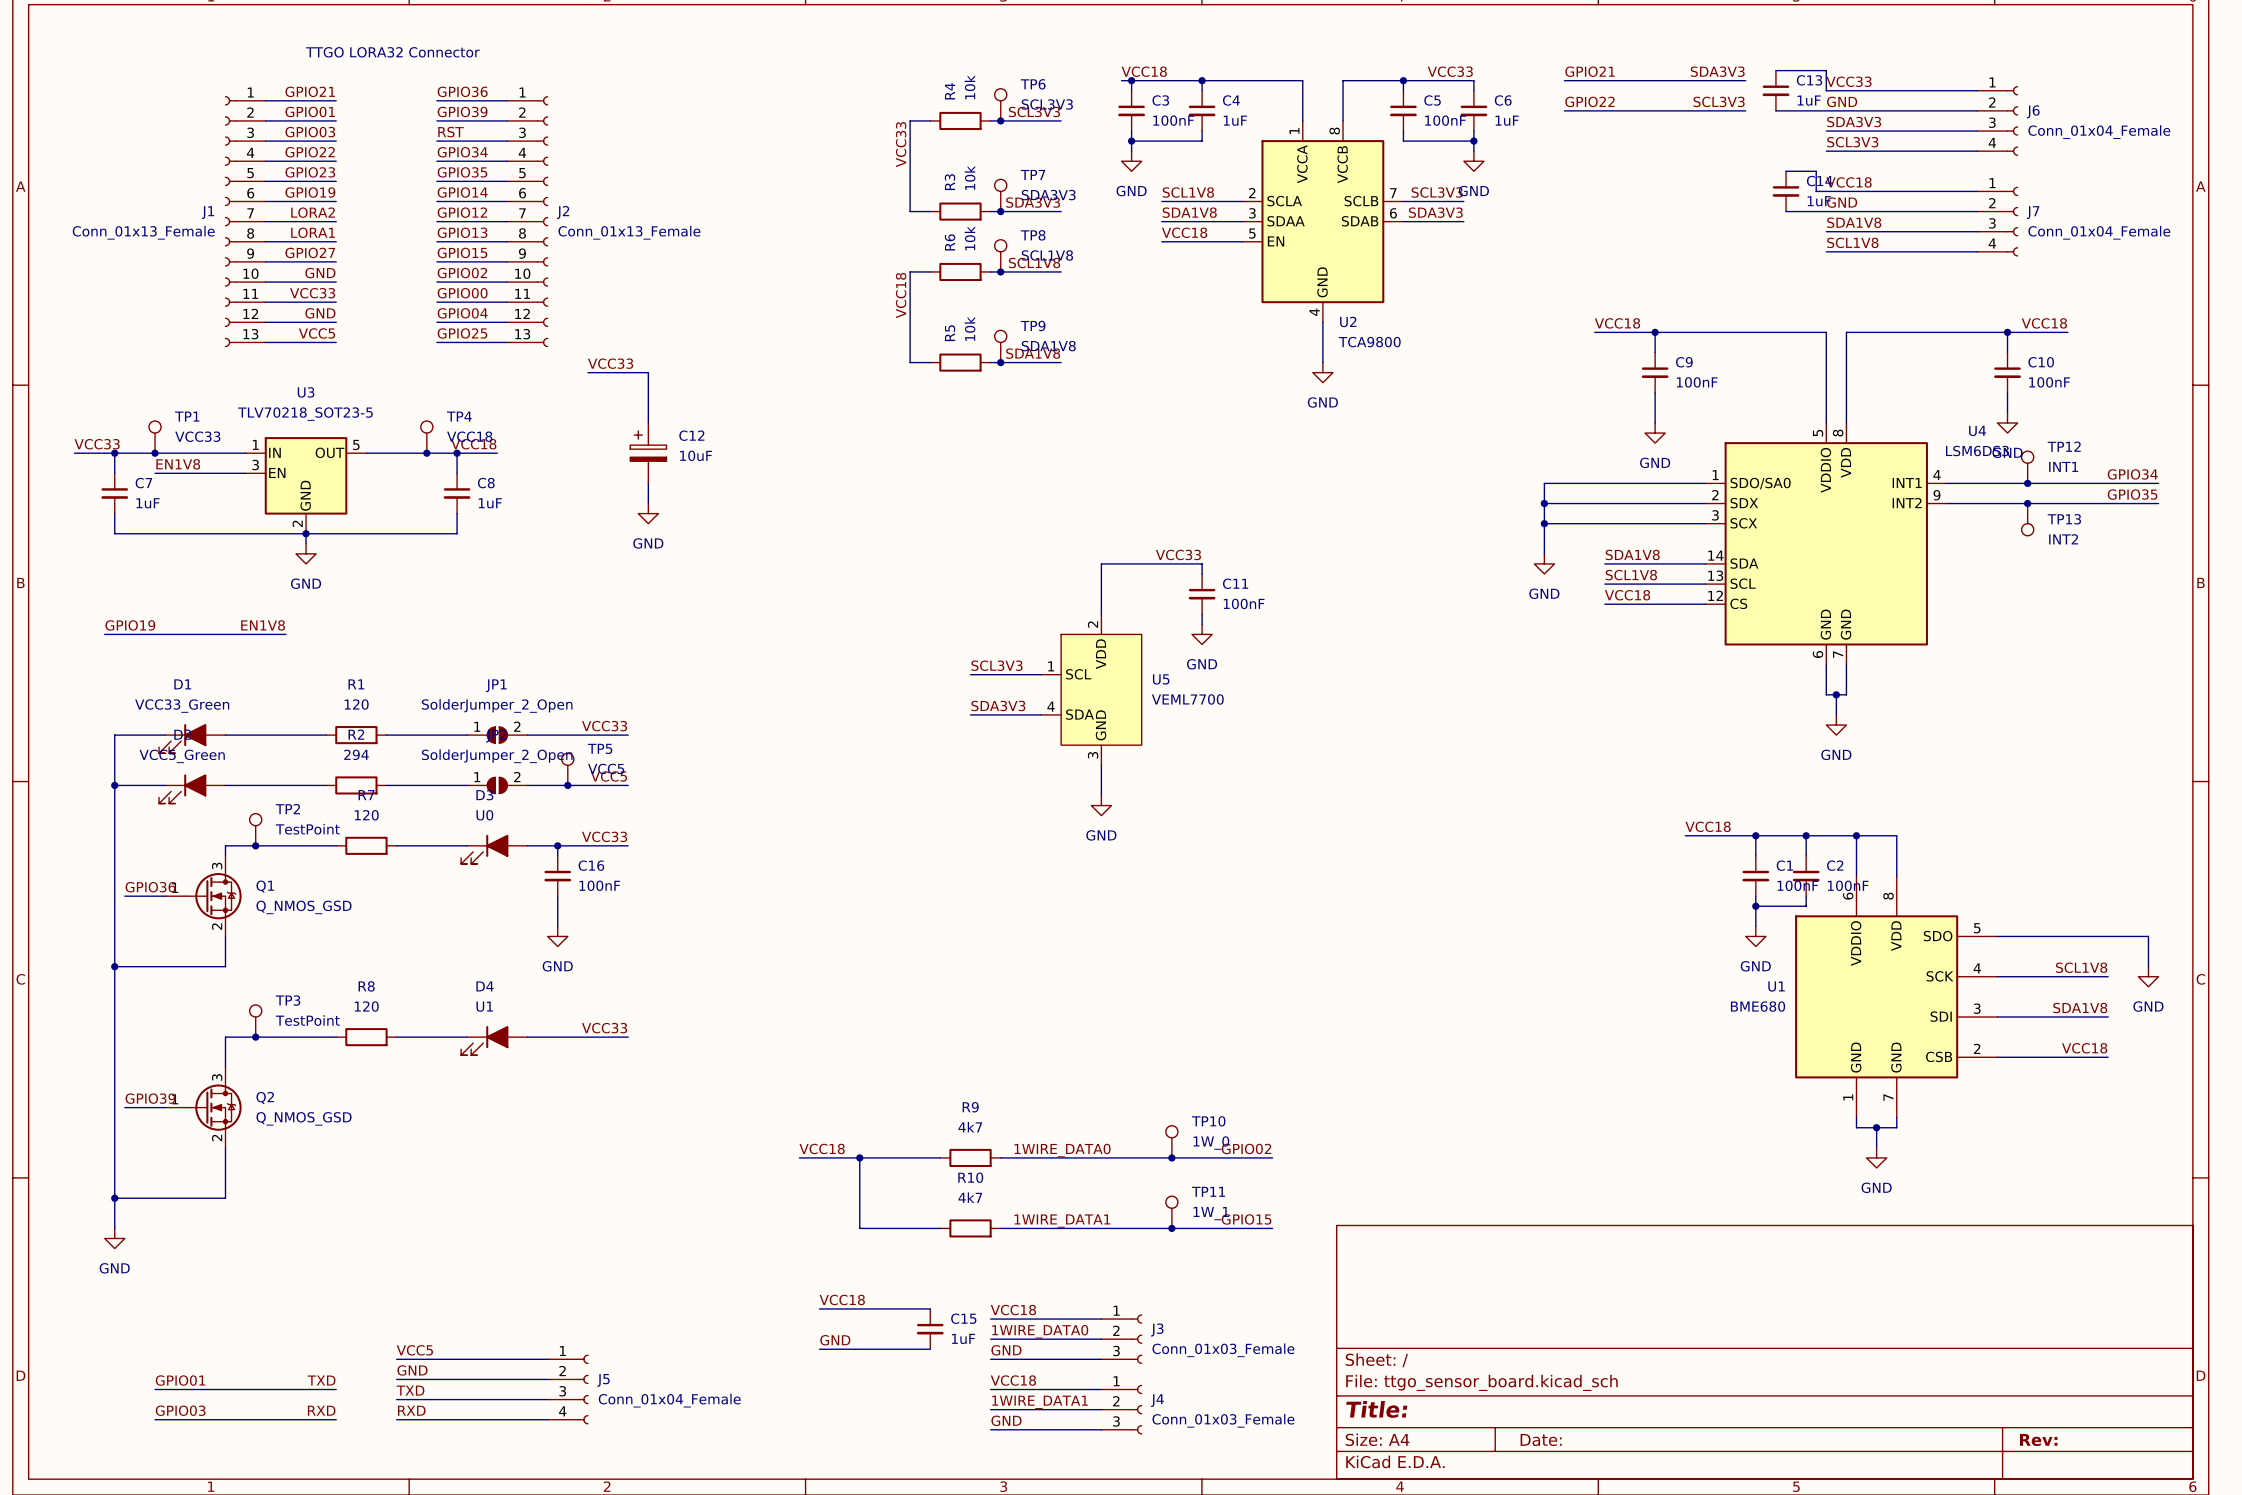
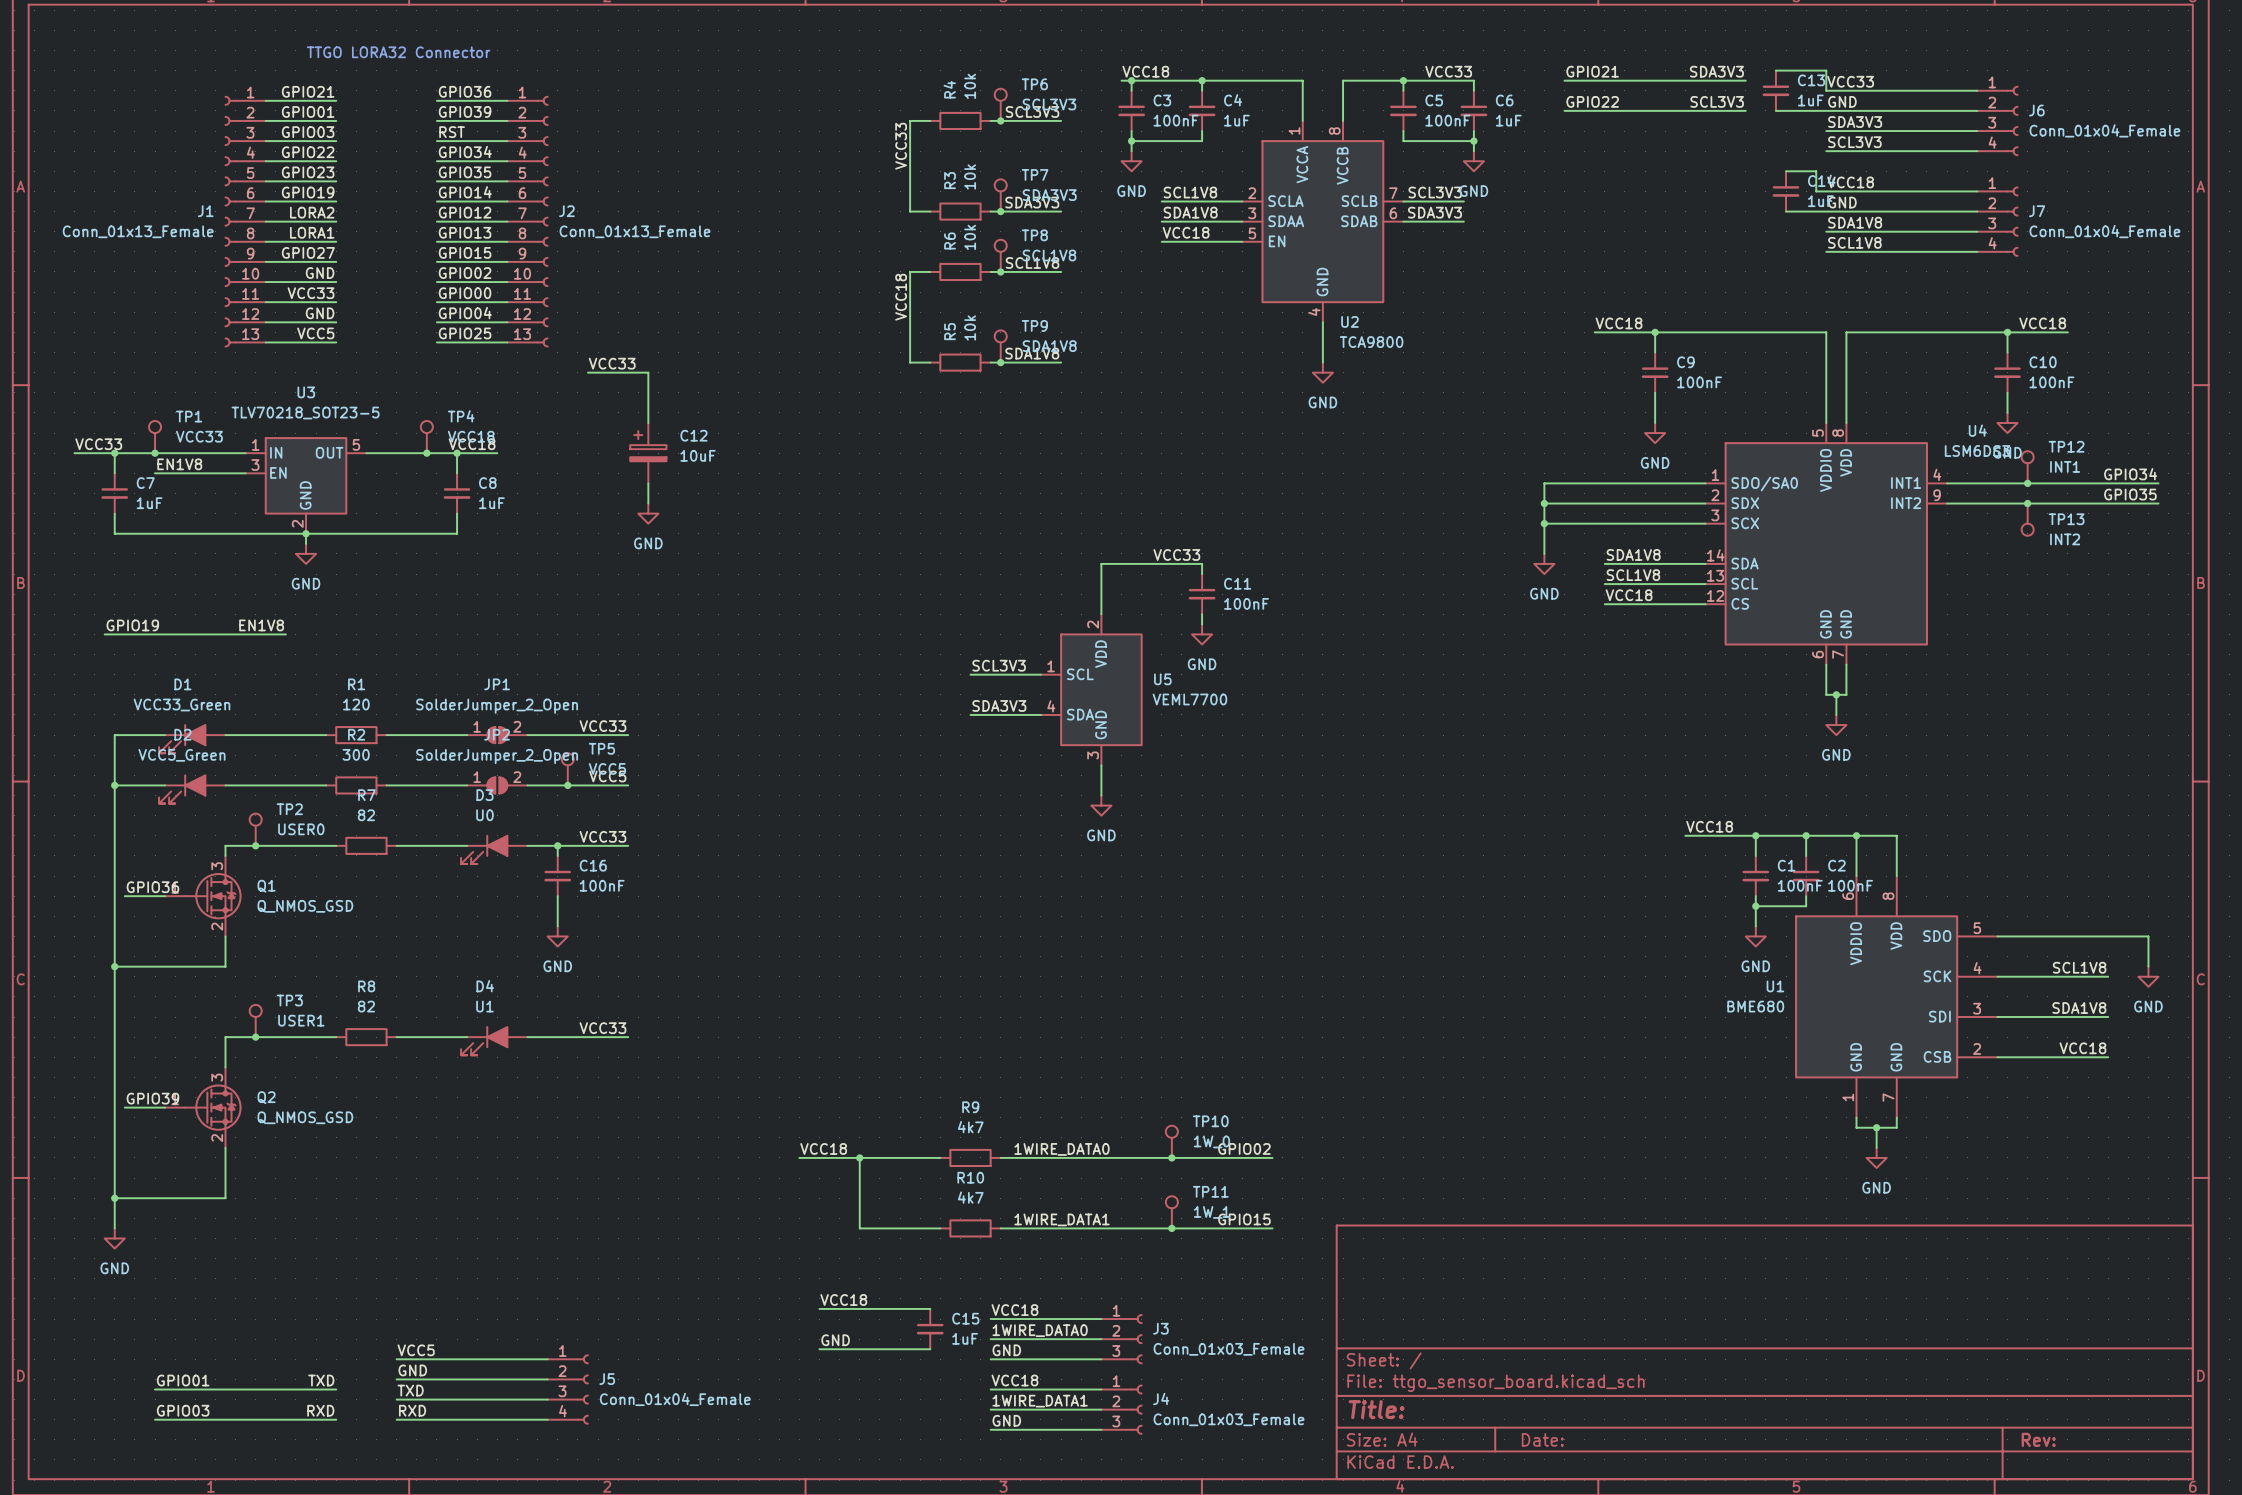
R2 value: 294 (356, 754) -> 300 (356, 754)
R7 value: 120 (366, 815) -> 82 (366, 815)
TP2 value: TestPoint (307, 829) -> USER0 (301, 829)
R8 value: 120 (366, 1006) -> 82 (366, 1006)
TP3 value: TestPoint (307, 1020) -> USER1 (301, 1020)

